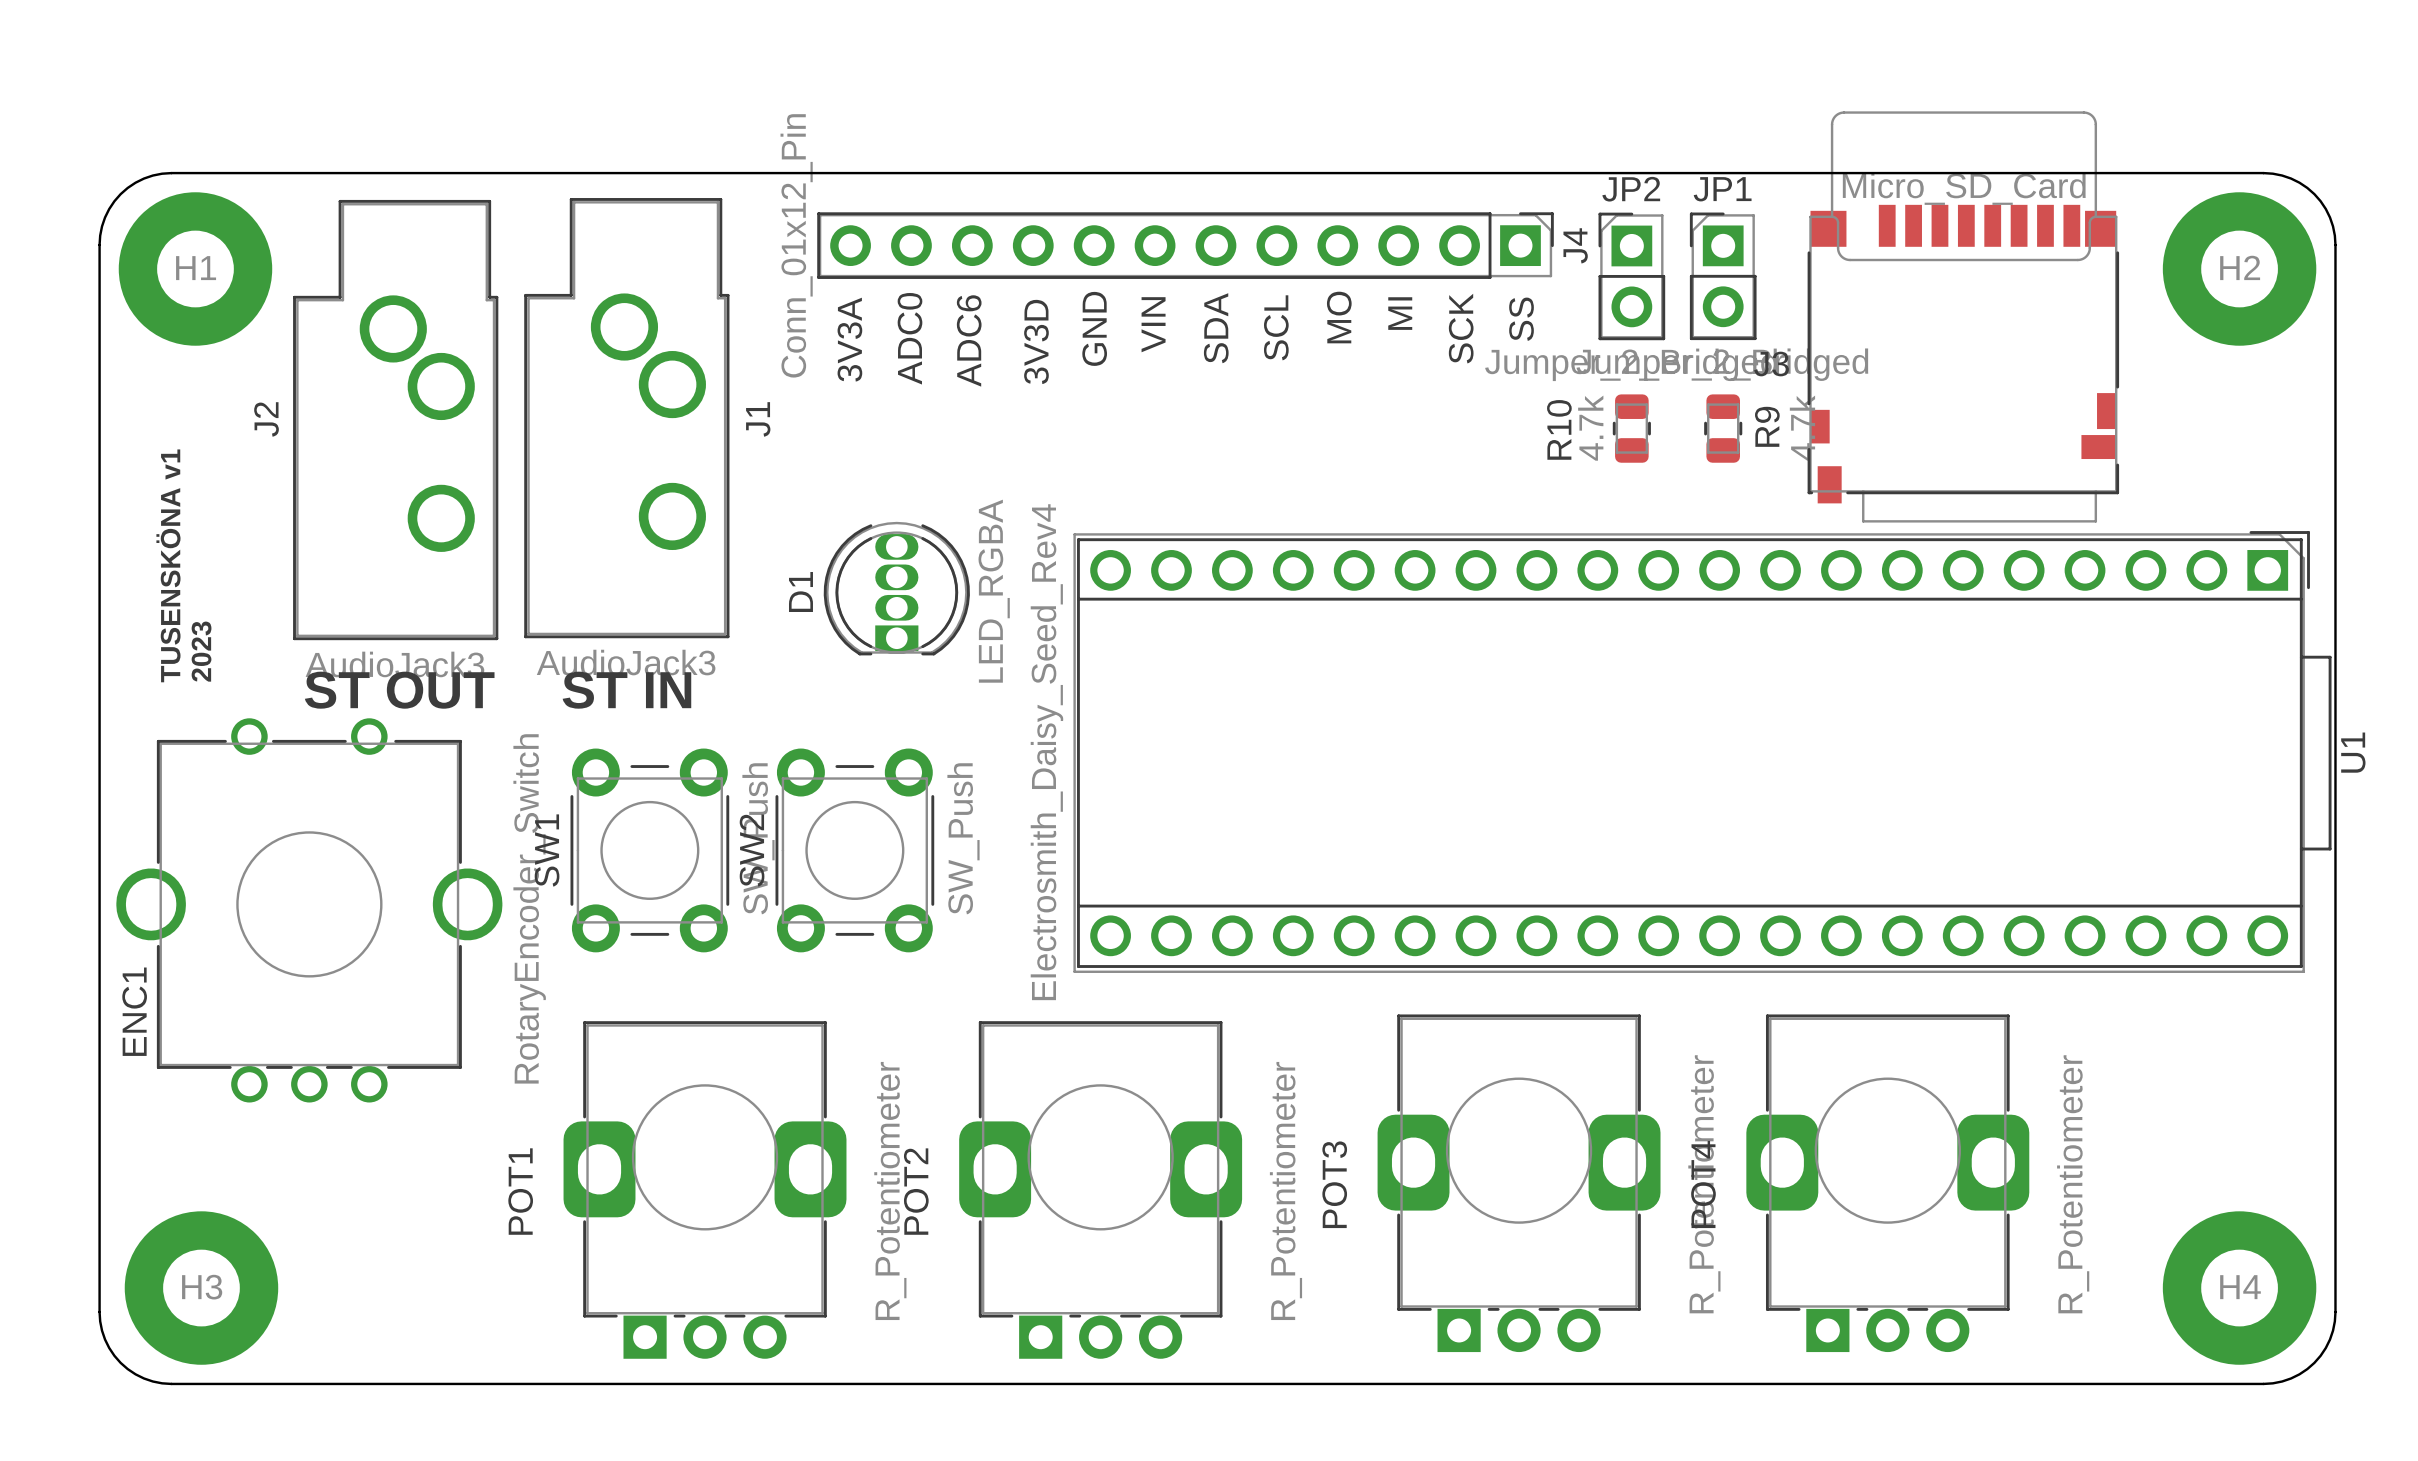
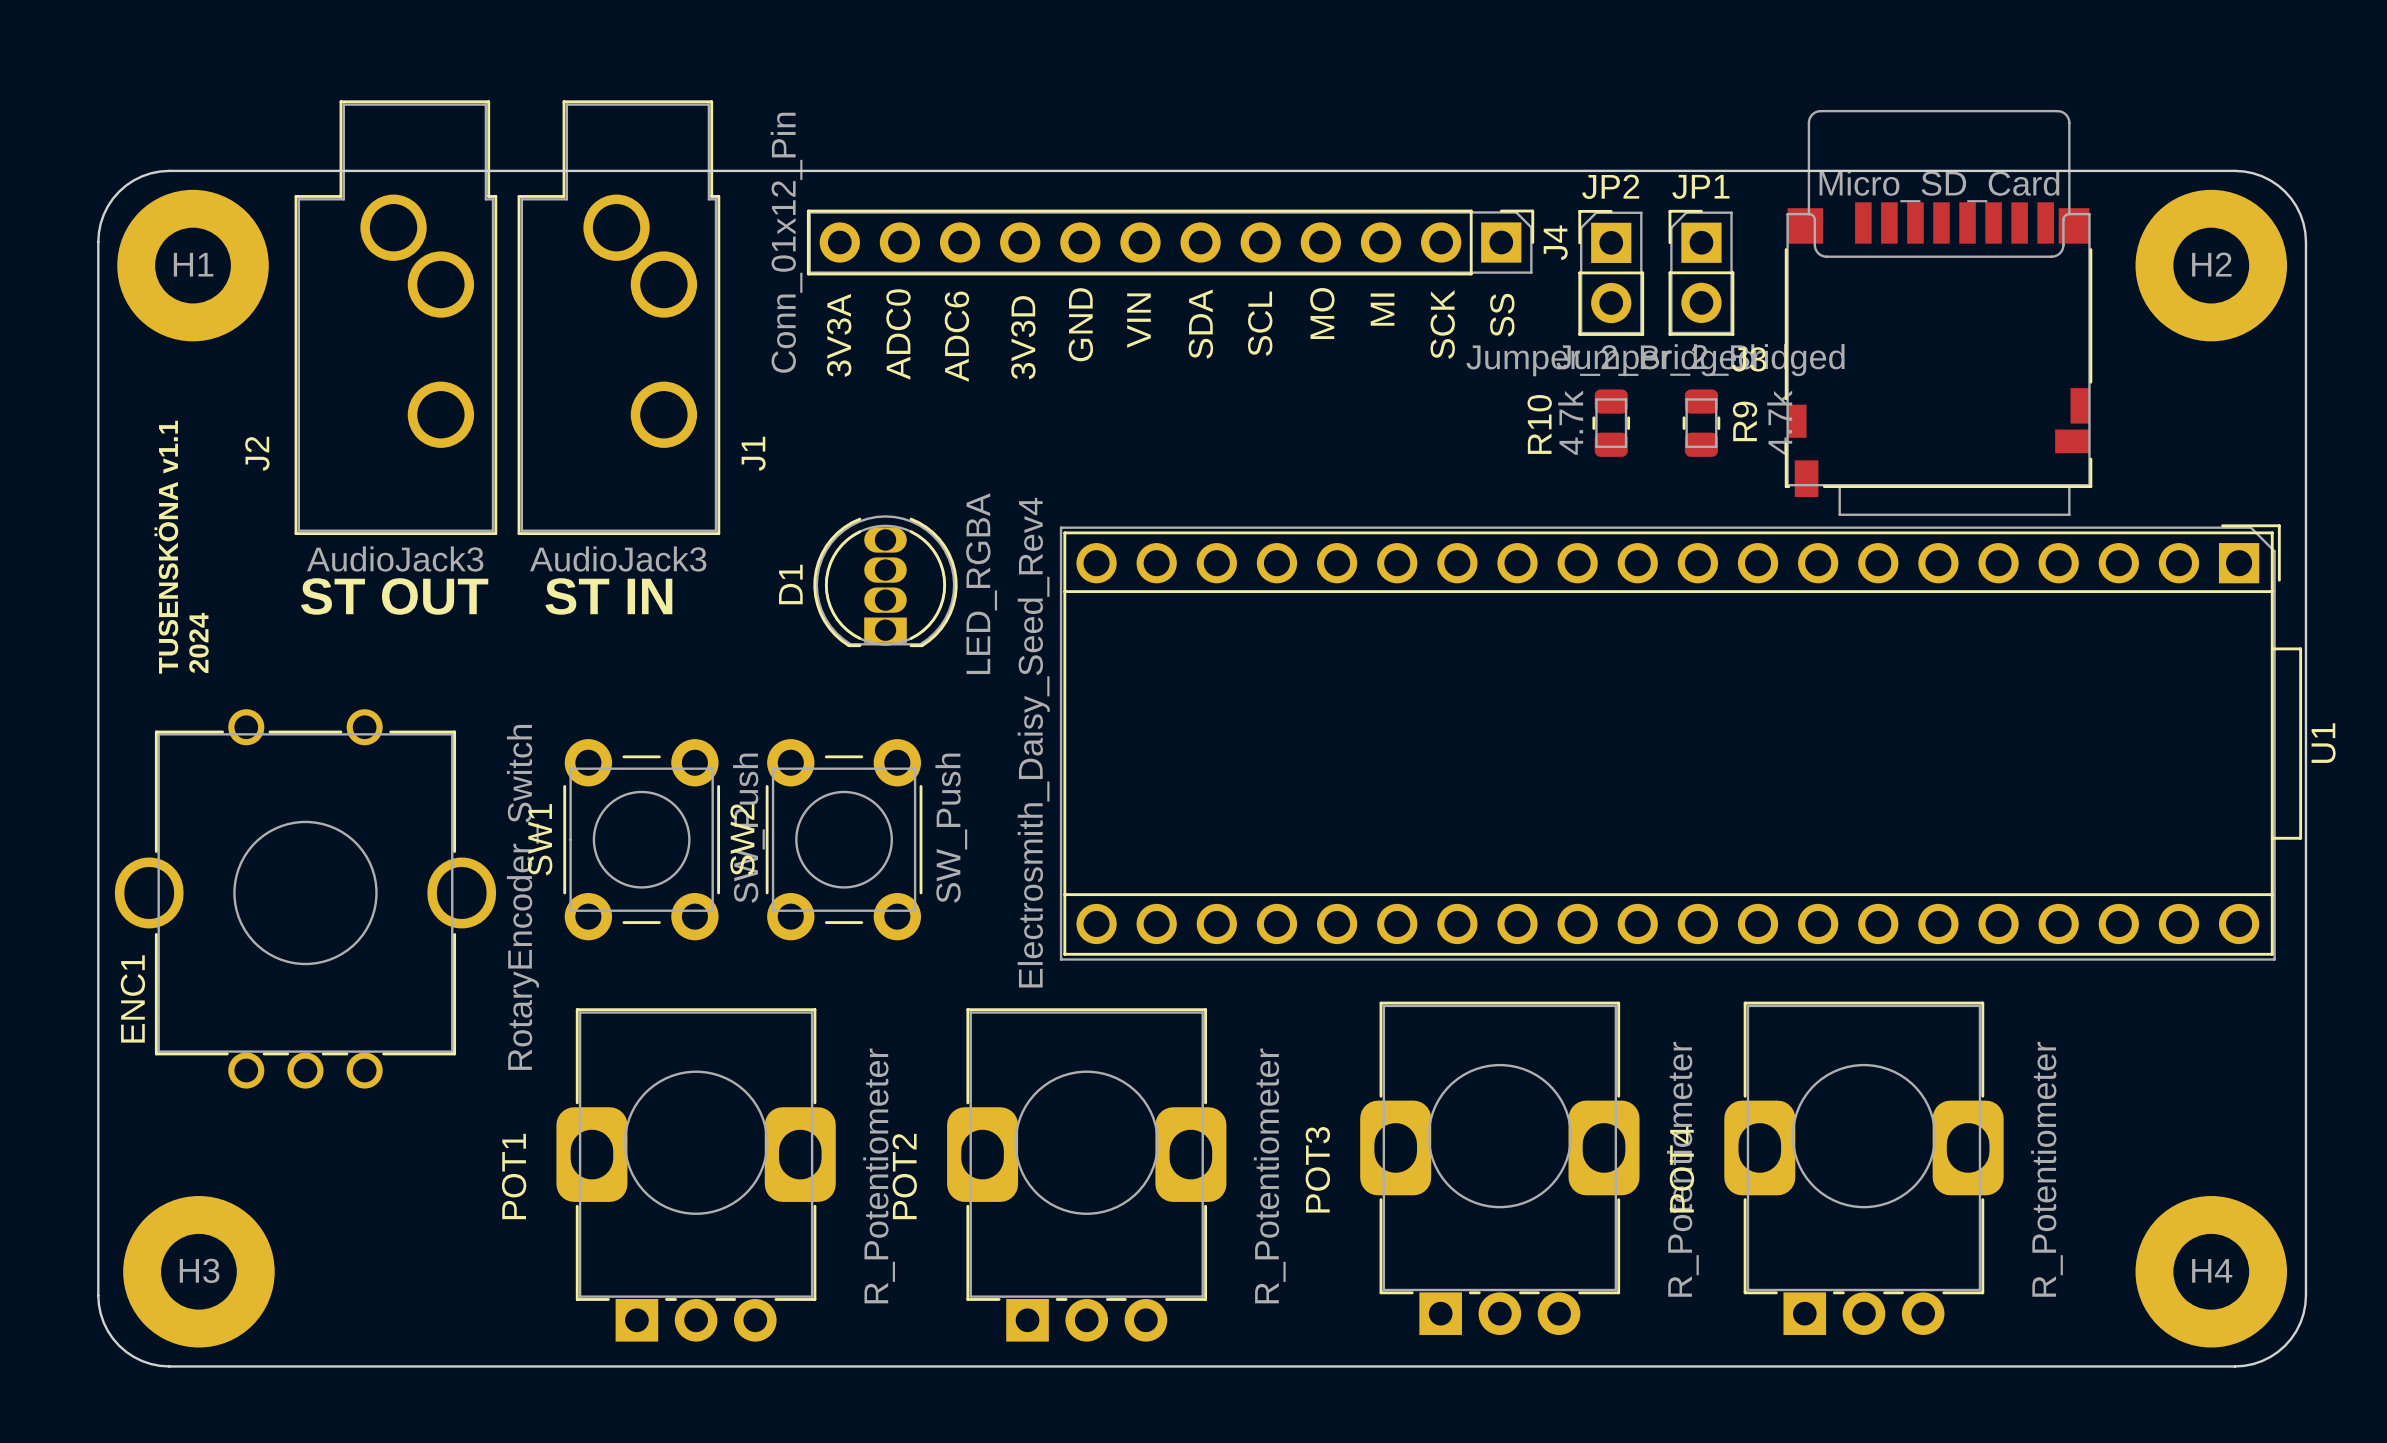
J1 position: (626, 418) -> (618, 317)
J2 name position: J2 (266, 419) -> J2 (257, 453)
J1 name position: J1 (758, 419) -> J1 (753, 453)
J2 position: (395, 420) -> (395, 317)
text: TUSENSKÖNA v1 (168, 565) -> TUSENSKÖNA v1.1 (166, 547)
text: 2023 (201, 651) -> 2024 (198, 642)
text position: ST OUT (399, 690) -> ST OUT (394, 596)
text position: ST IN (626, 690) -> ST IN (608, 596)

